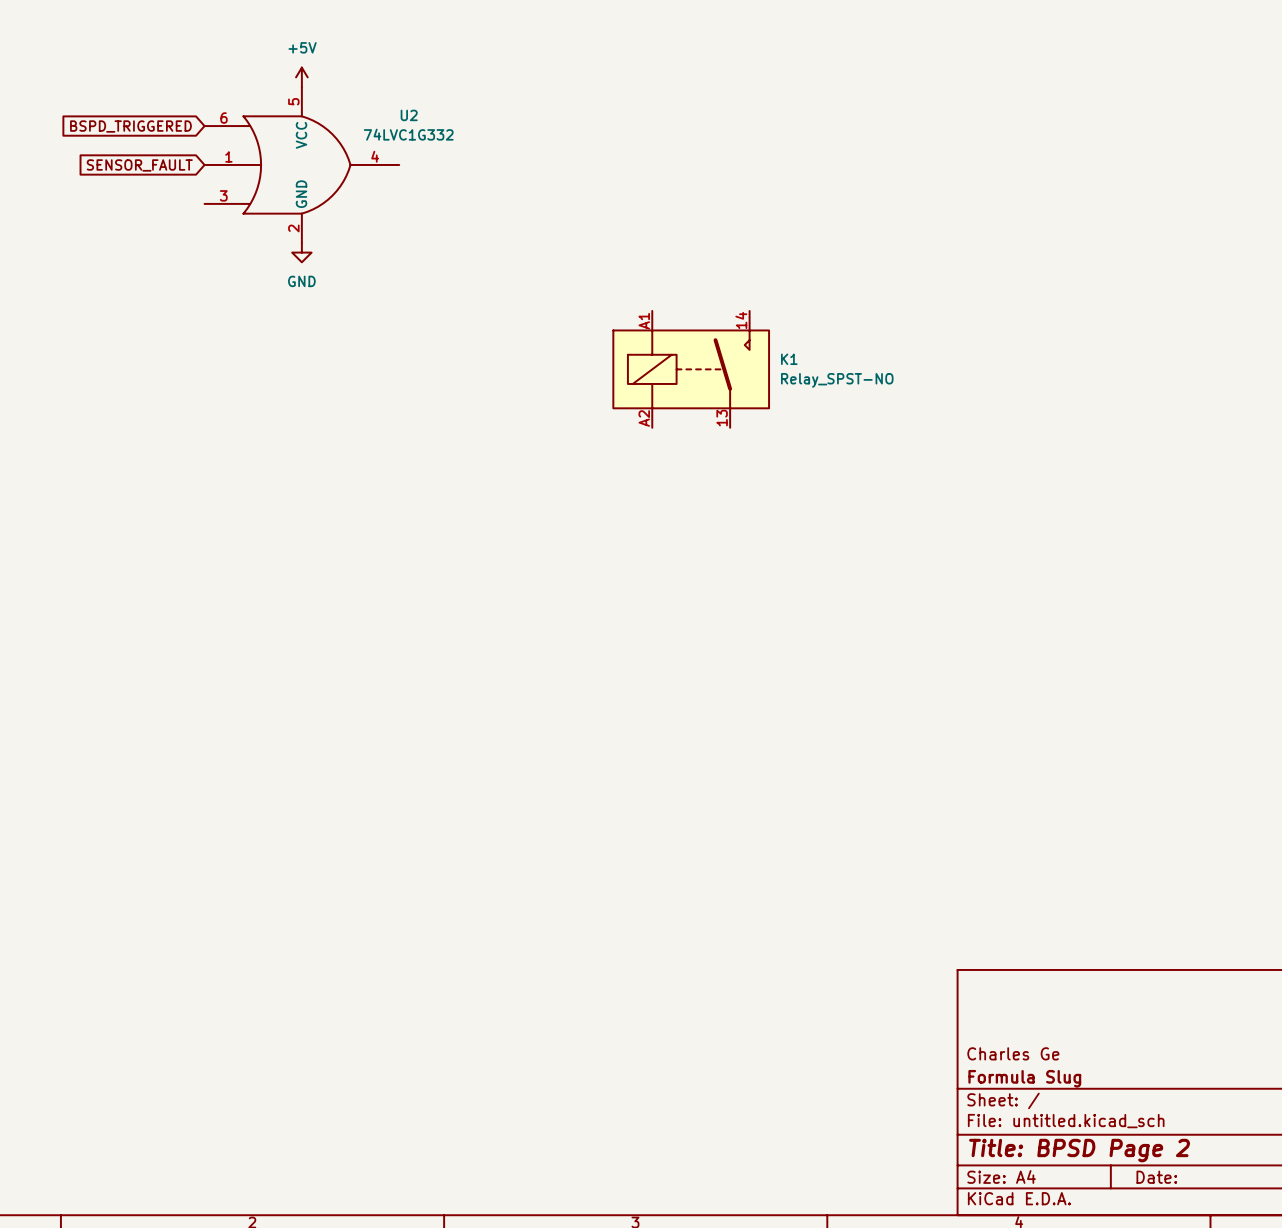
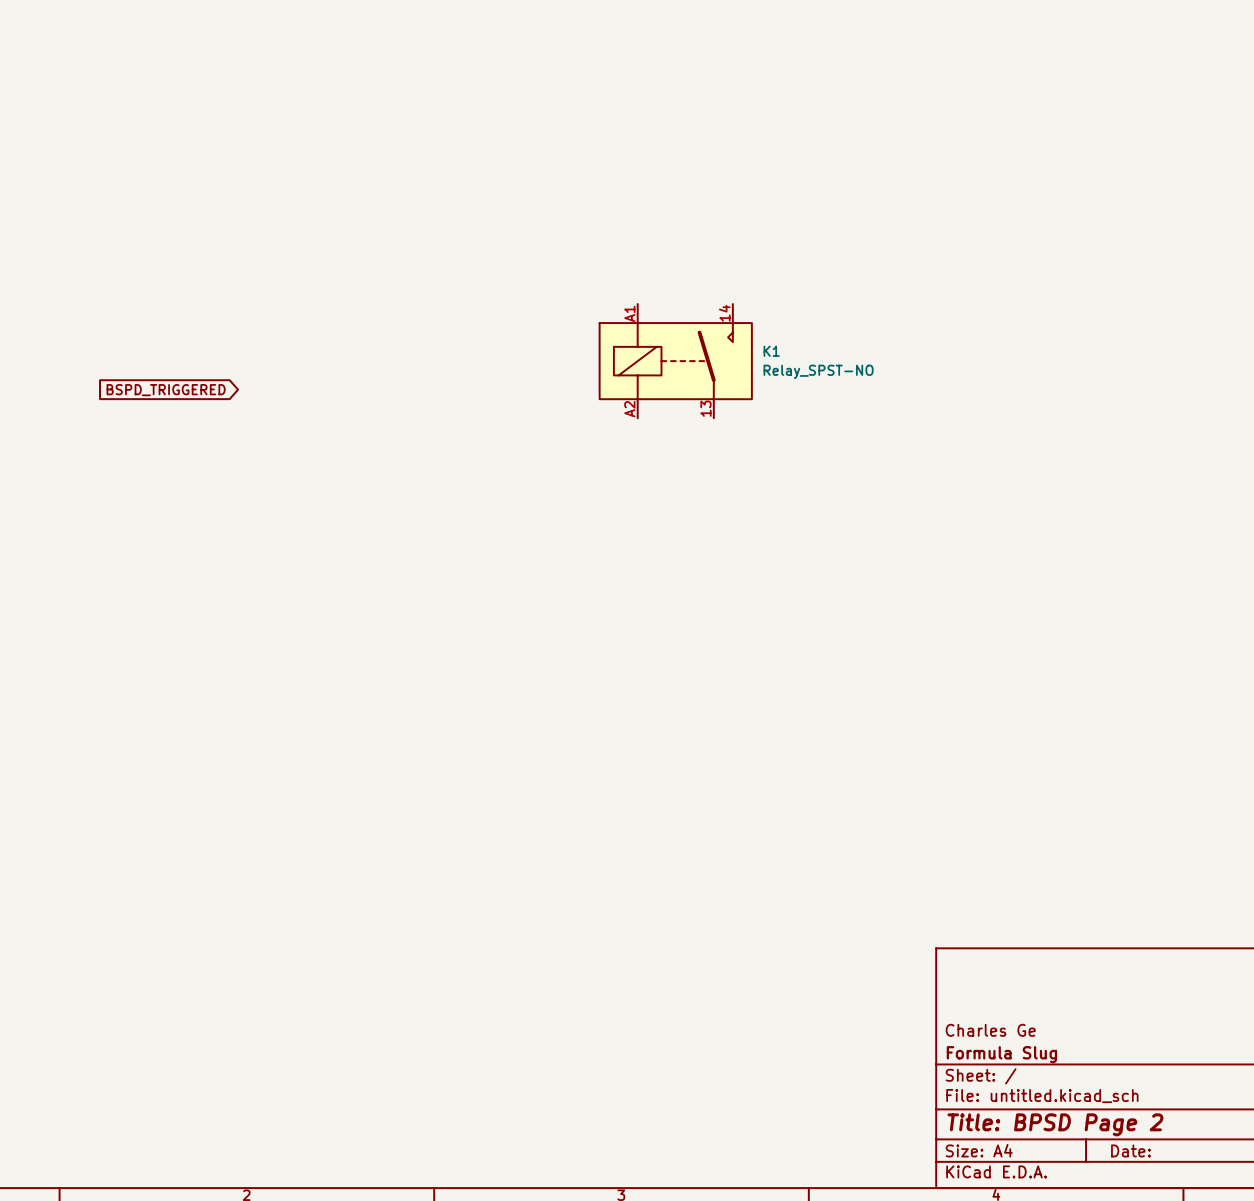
power symbol: +5V (301, 77) -> none
global label: BSPD_TRIGGERED (130, 126) -> none
U2: 74LVC1G332 (301, 164) -> none
global label: SENSOR_FAULT (139, 165) -> none
power symbol: GND (301, 252) -> none
global label: none -> BSPD_TRIGGERED (166, 390)

